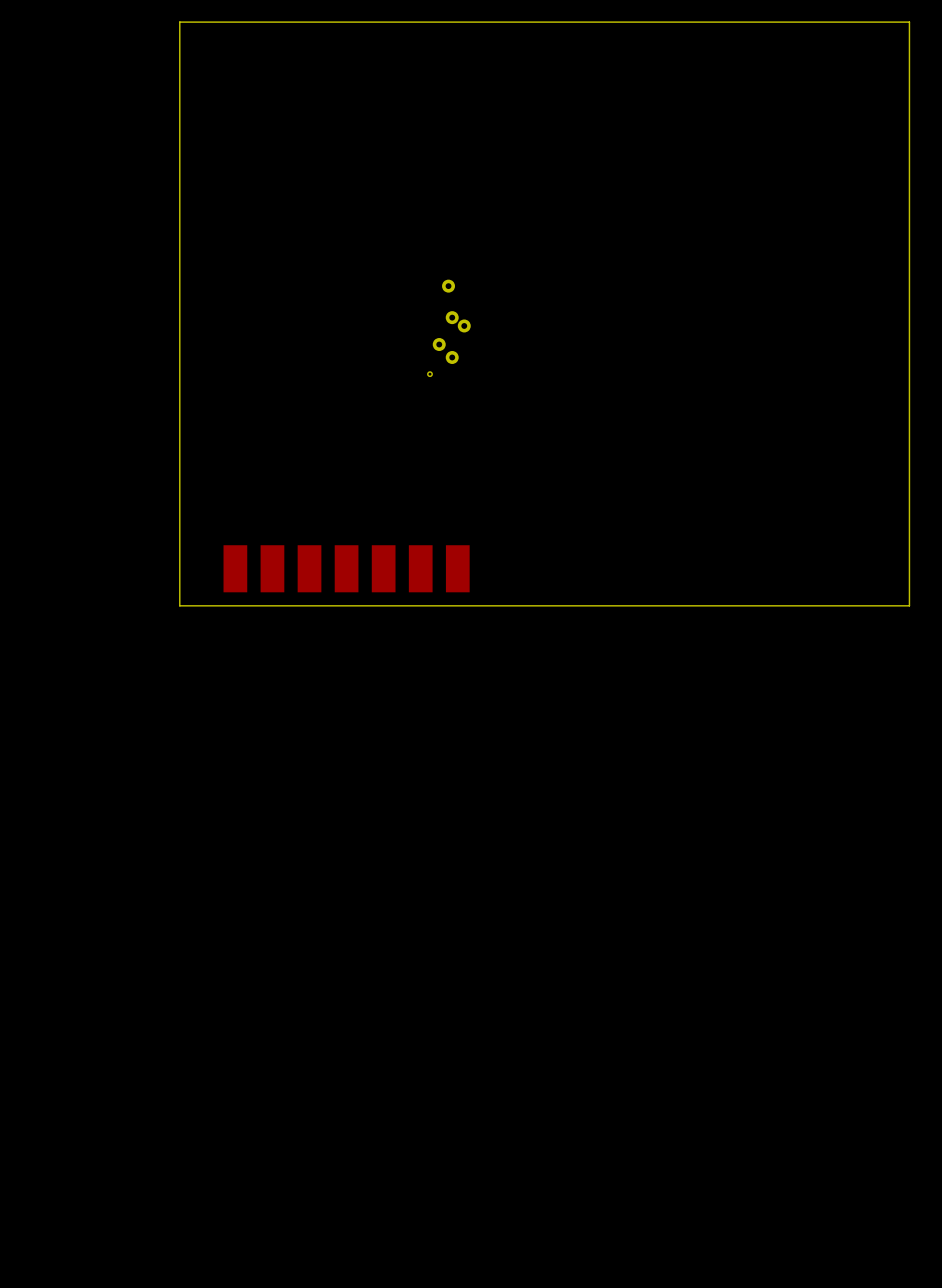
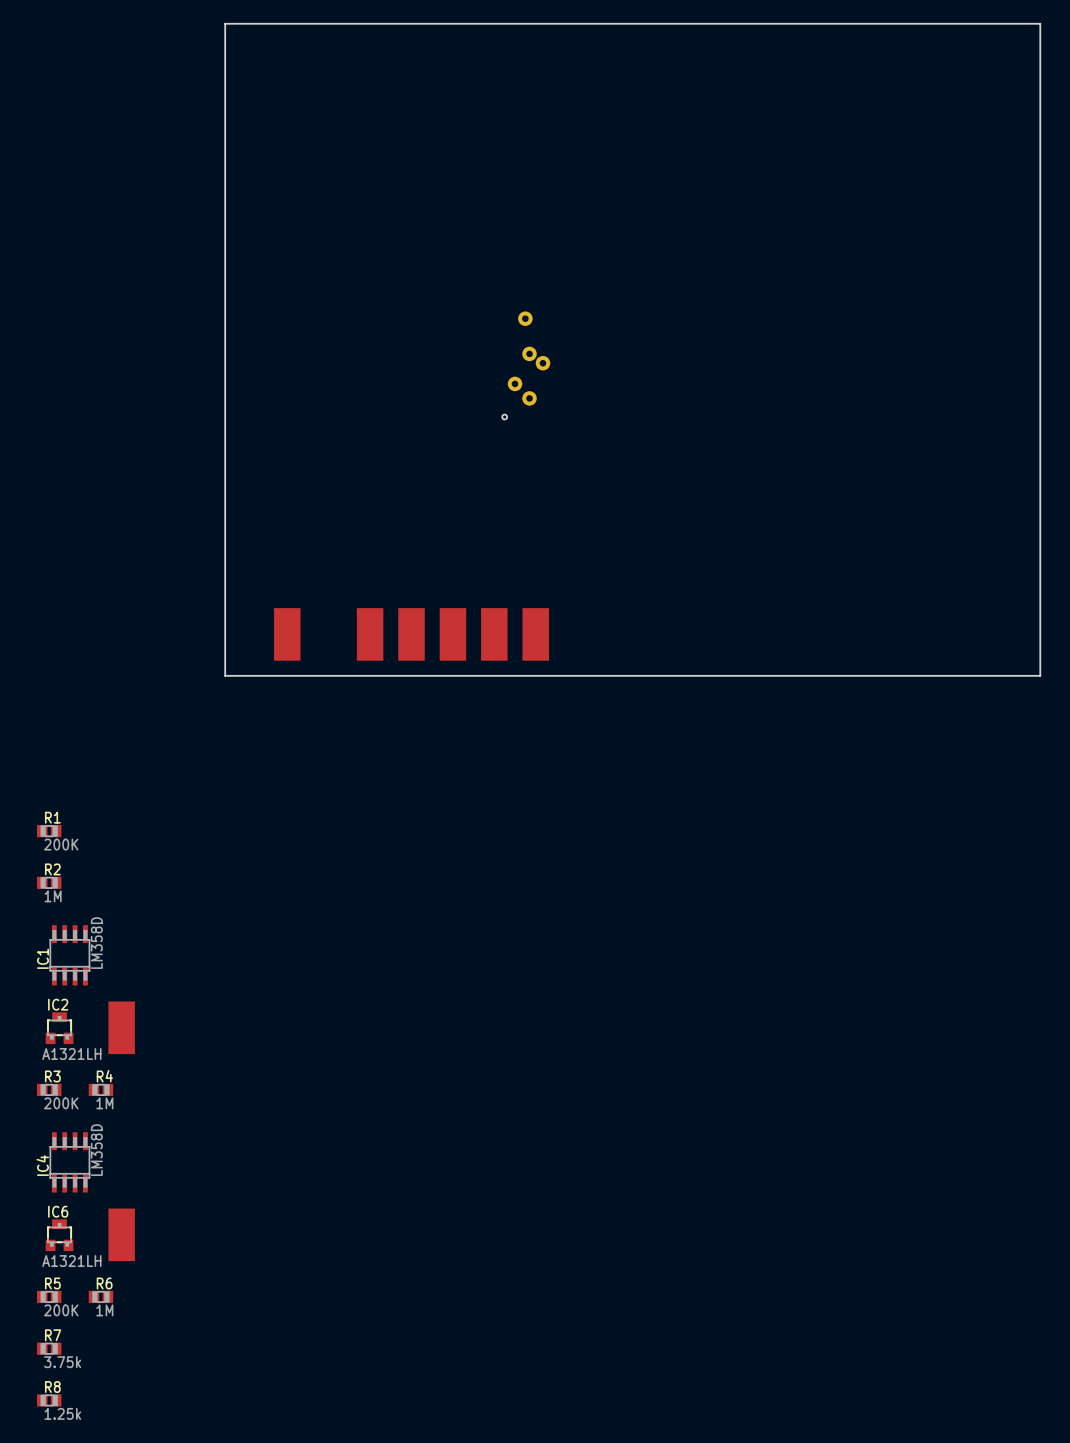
part: (272, 568) -> none
R1: none -> 200K (49, 831)
R2: none -> 1M (49, 882)
IC1: none -> LM358D (69, 955)
part: none -> (121, 1027)
IC2: none -> A1321LH (59, 1028)
R3: none -> 200K (49, 1089)
R4: none -> 1M (100, 1089)
IC4: none -> LM358D (69, 1162)
IC6: none -> A1321LH (59, 1235)
part: none -> (121, 1234)
R5: none -> 200K (49, 1296)
R6: none -> 1M (100, 1296)
R7: none -> 3.75k (49, 1348)
R8: none -> 1.25k (49, 1400)

